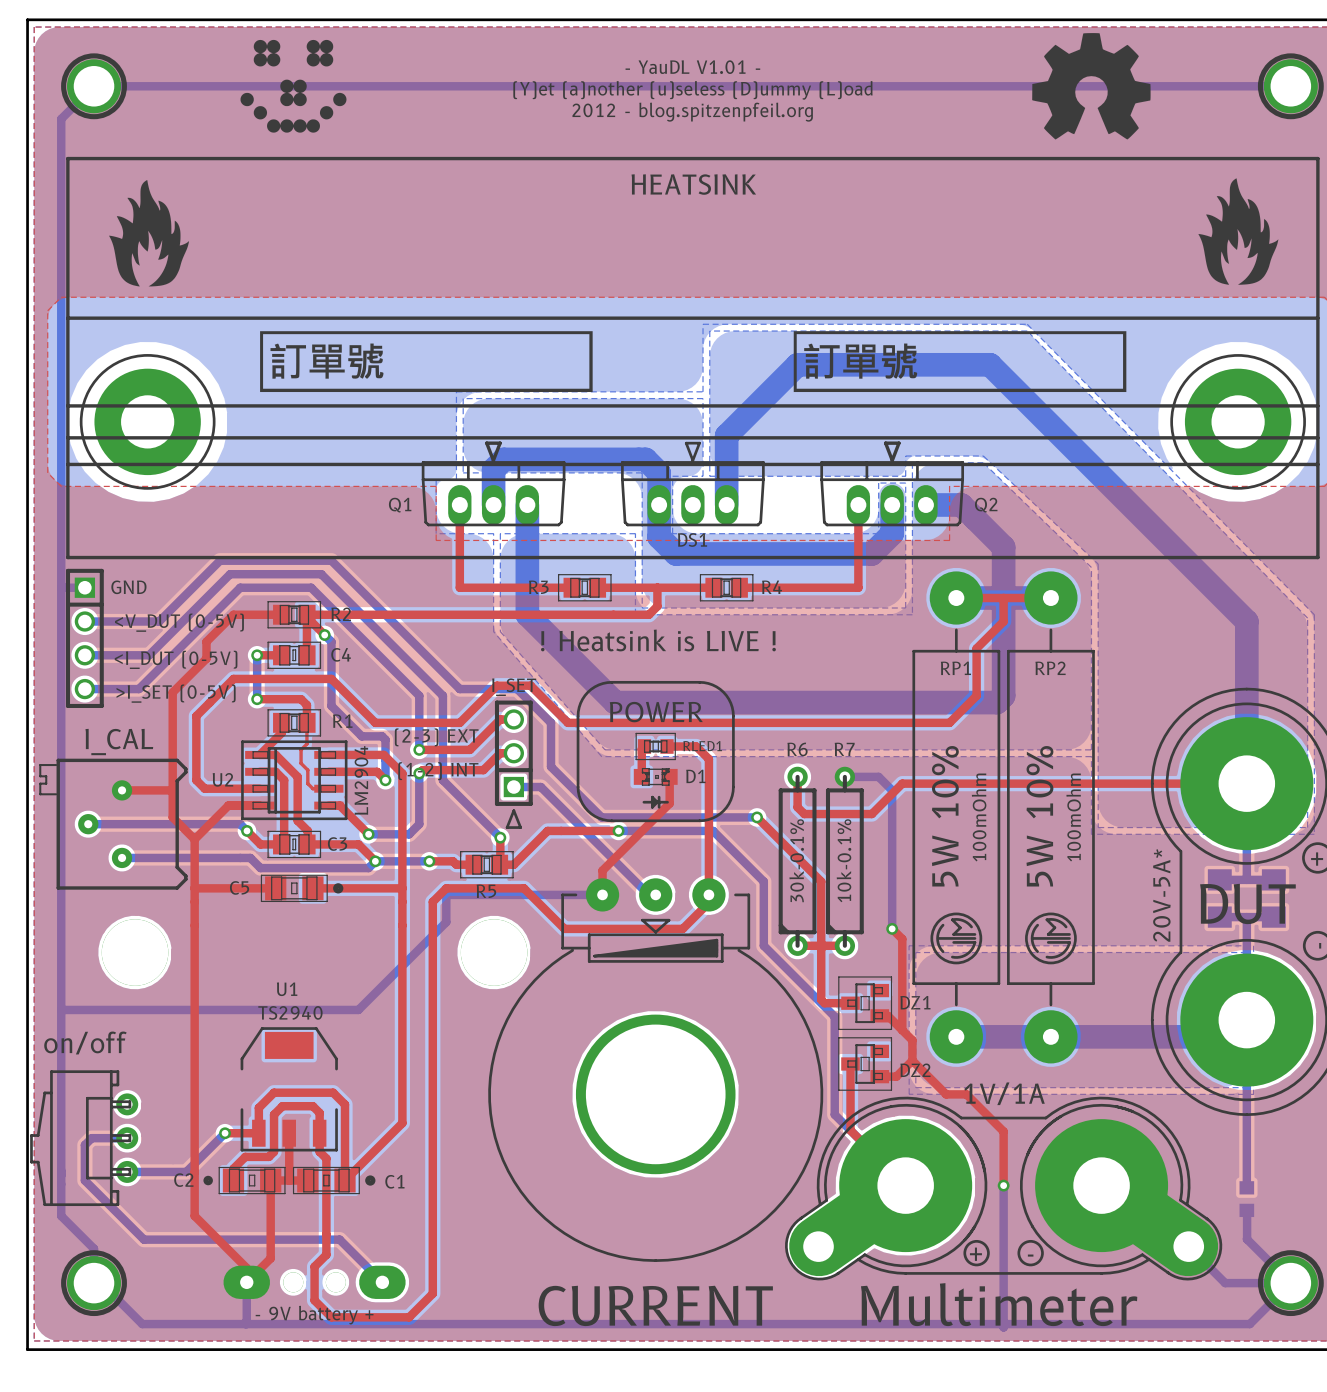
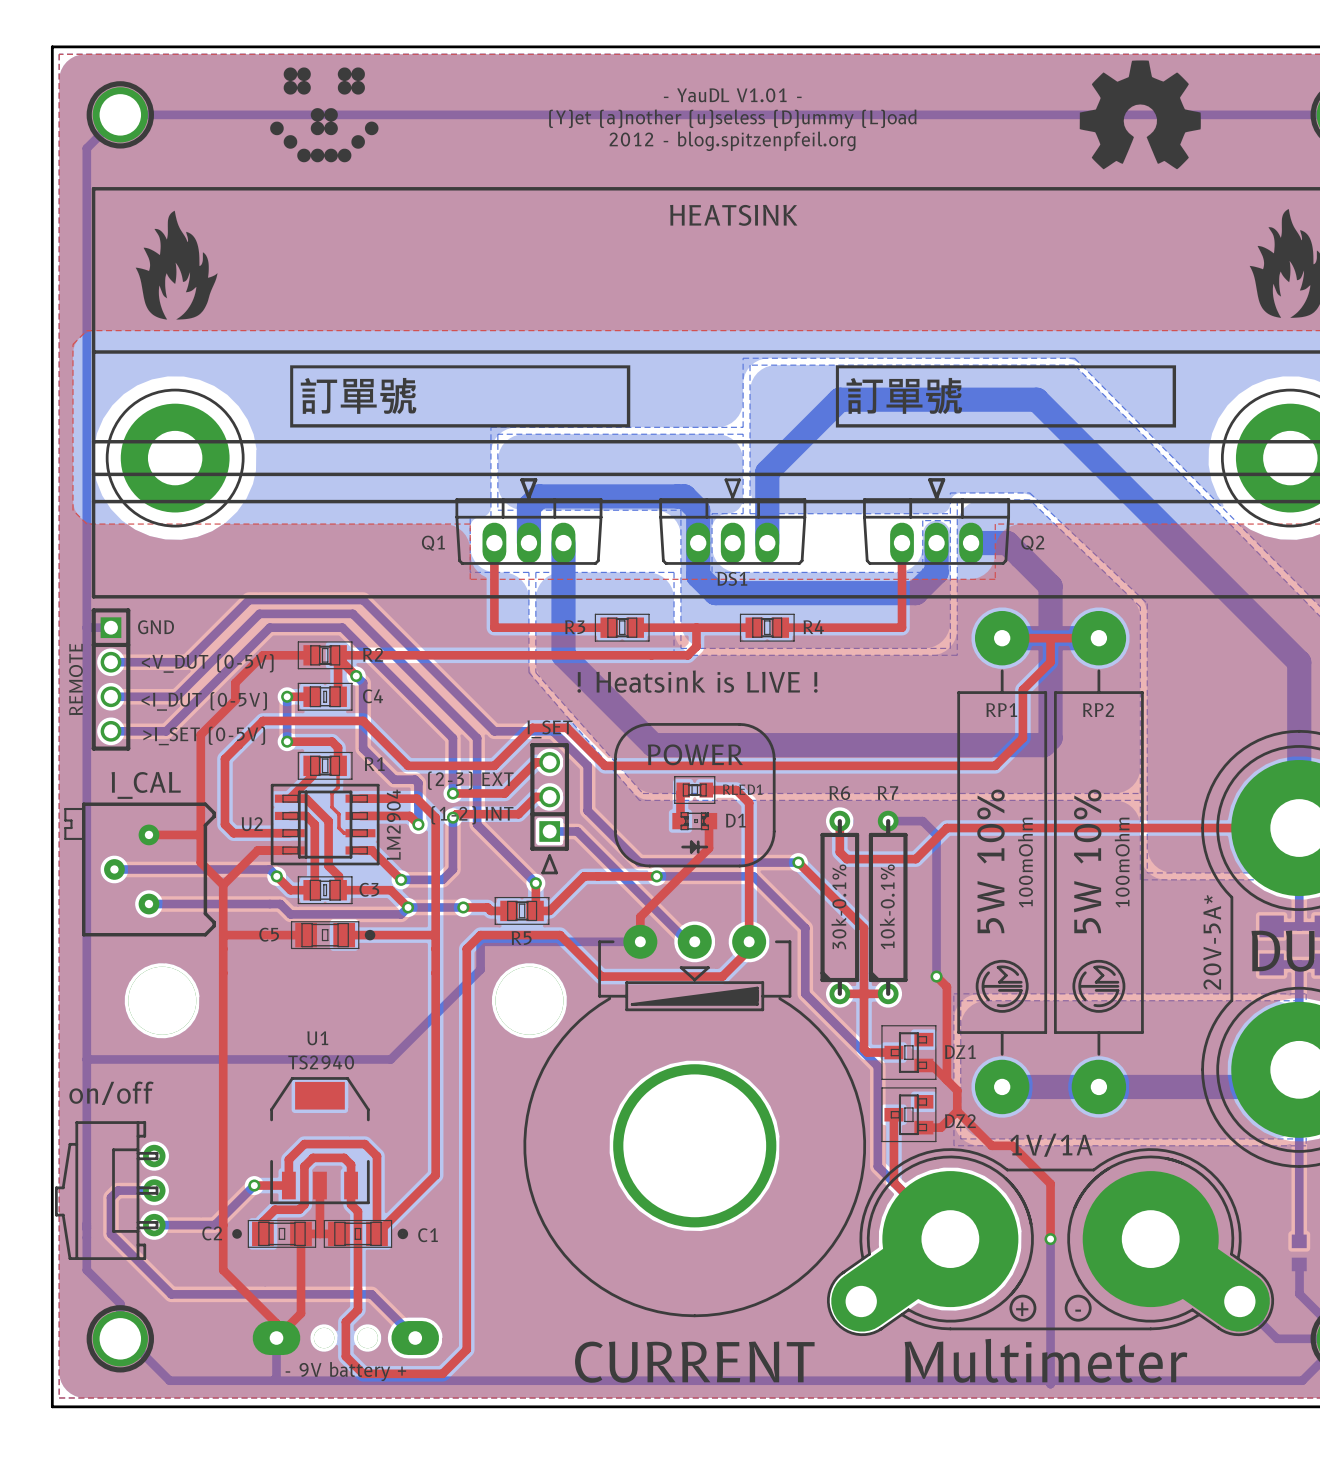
part value: none -> REMOTE (76, 679)

